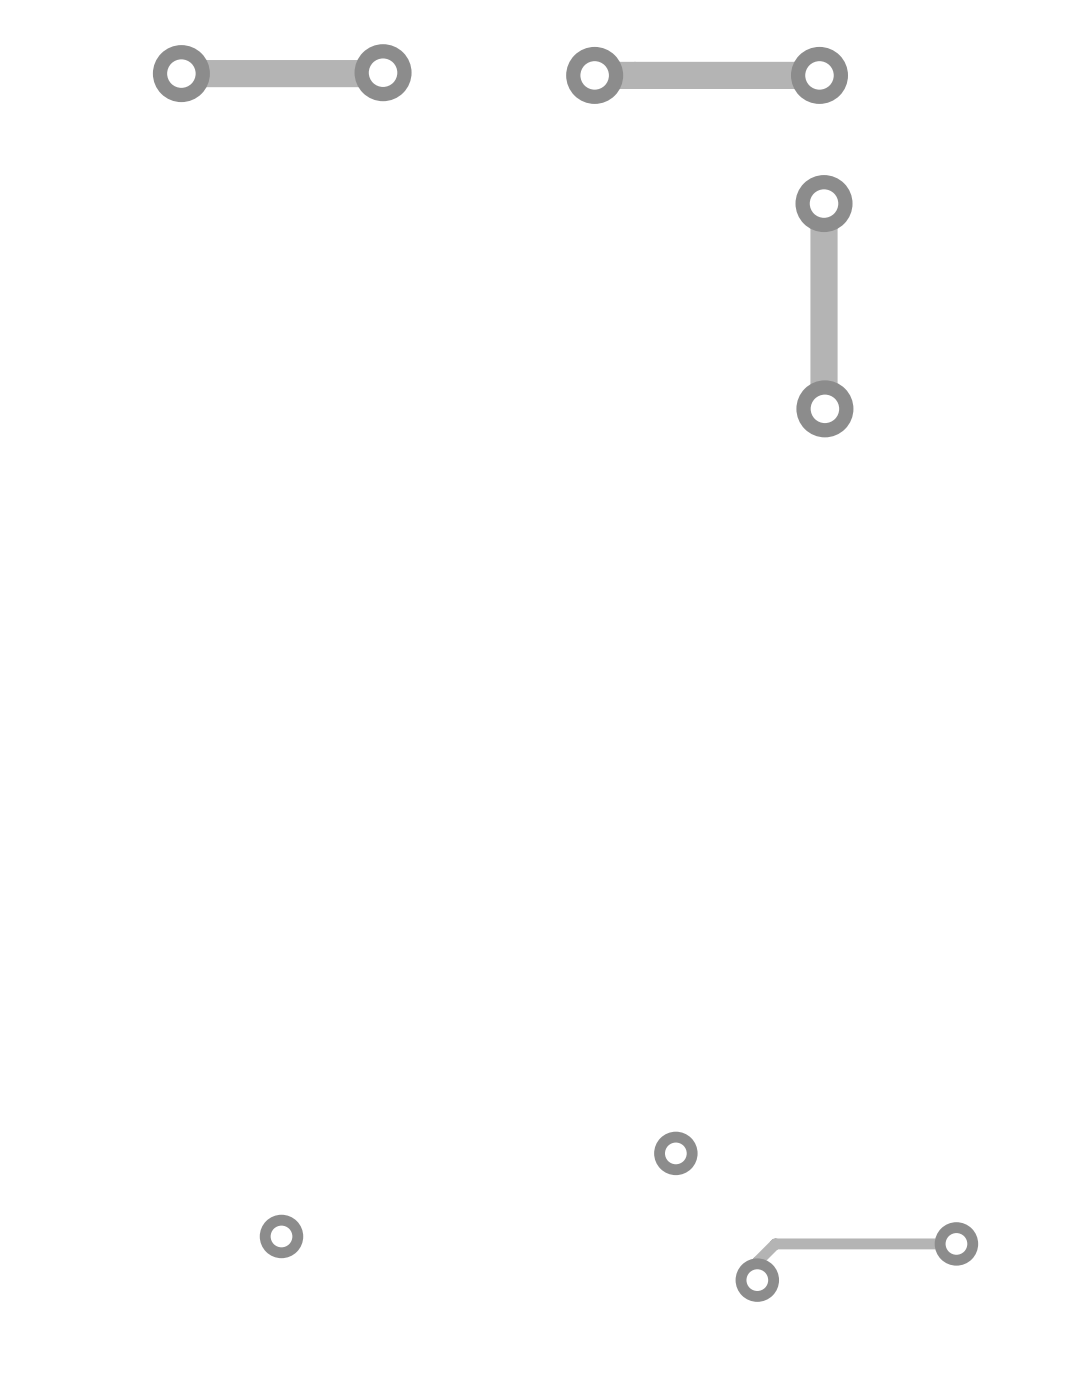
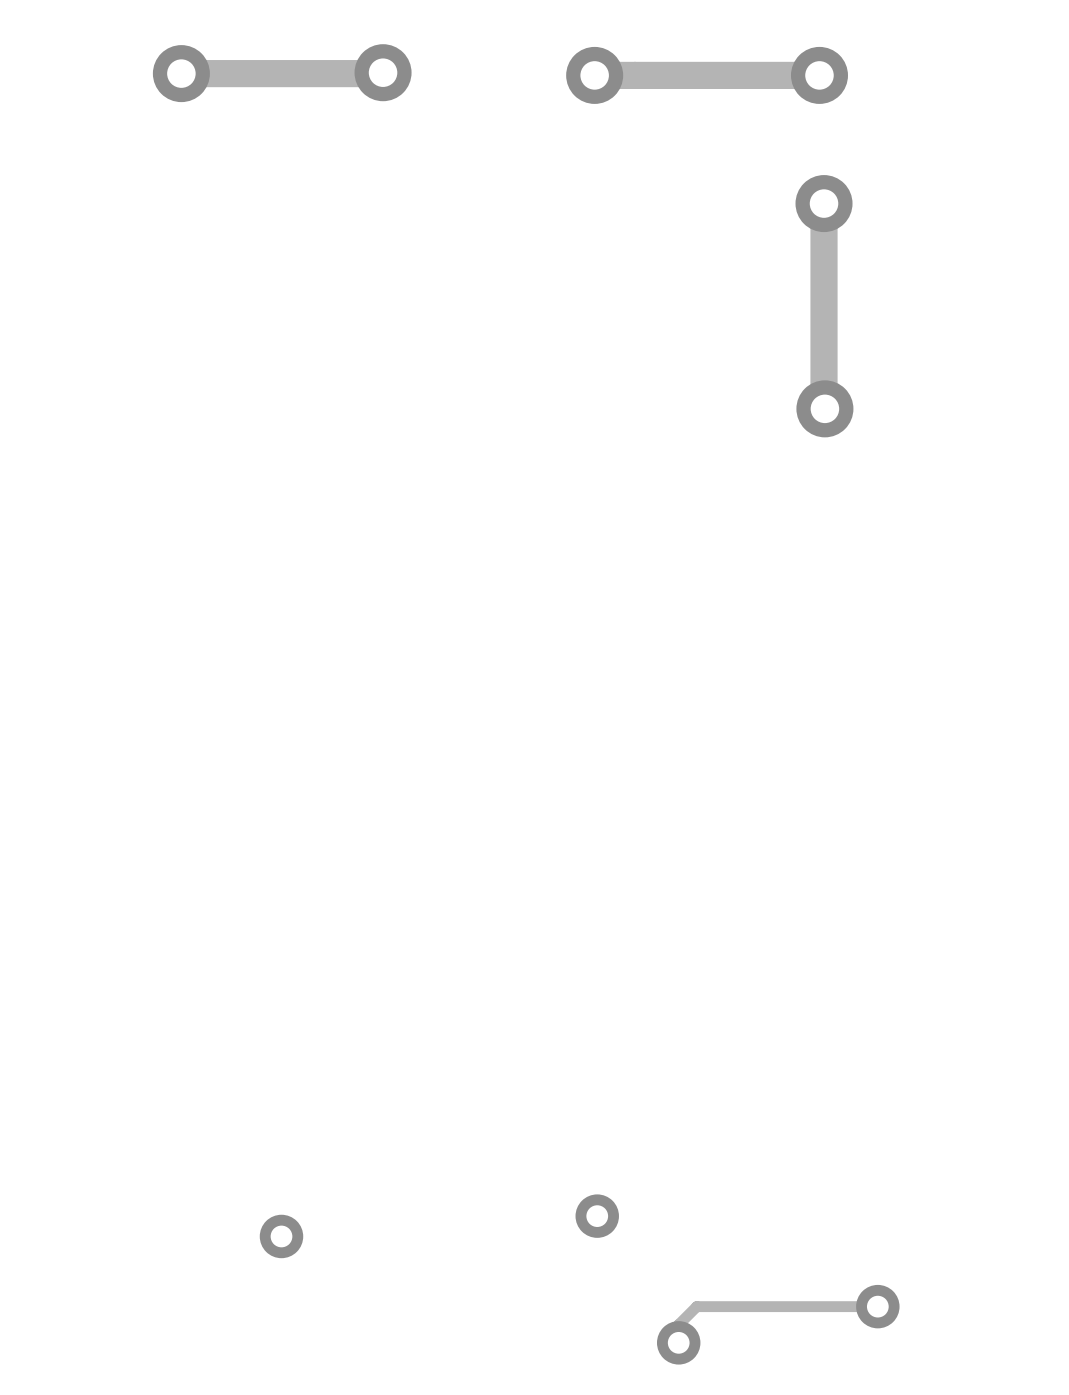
via: (675, 1153) -> none
via: none -> (597, 1216)
track: (956, 1243) (775, 1243) (757, 1262) (757, 1280) -> (877, 1306) (696, 1306) (678, 1324) (678, 1342)
via: (956, 1243) -> none
via: (757, 1280) -> none
via: none -> (877, 1306)
via: none -> (678, 1342)

